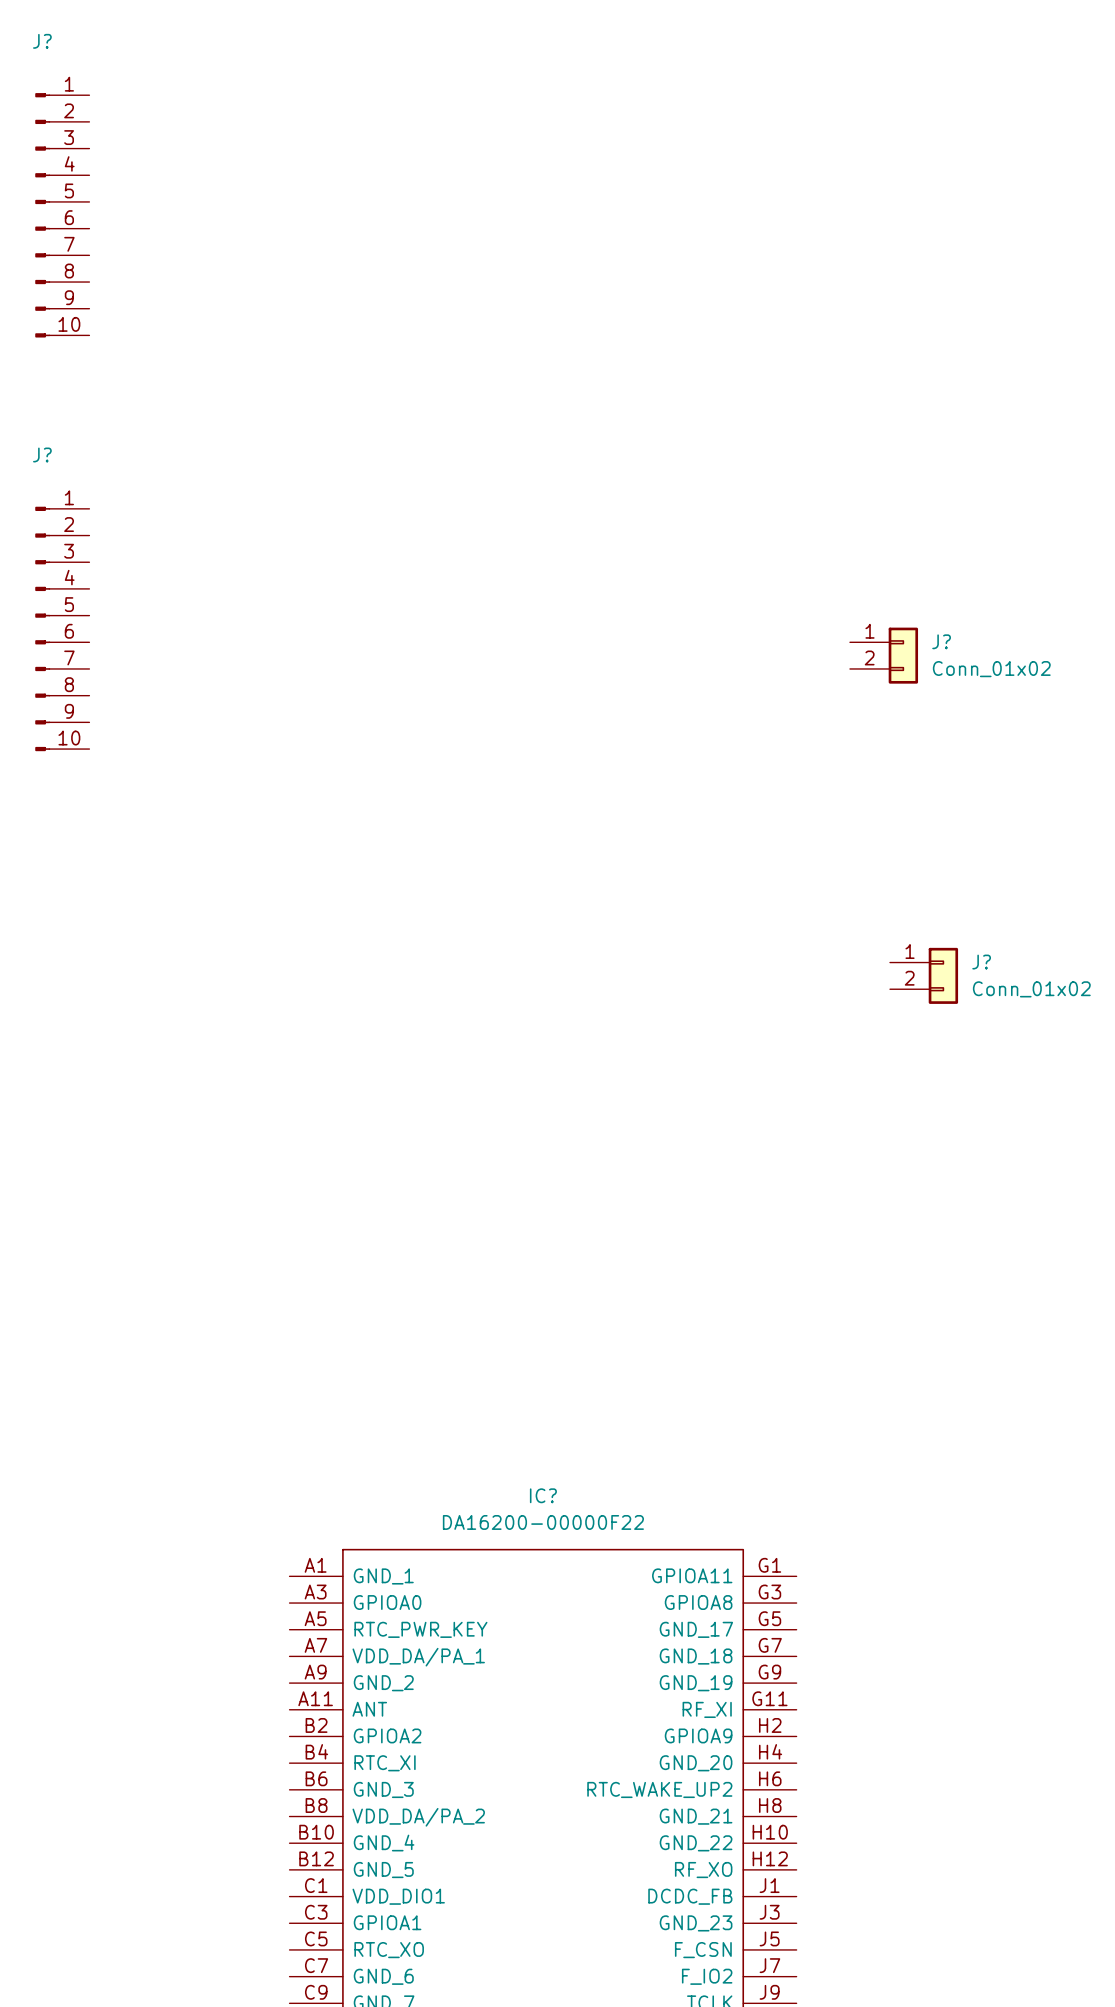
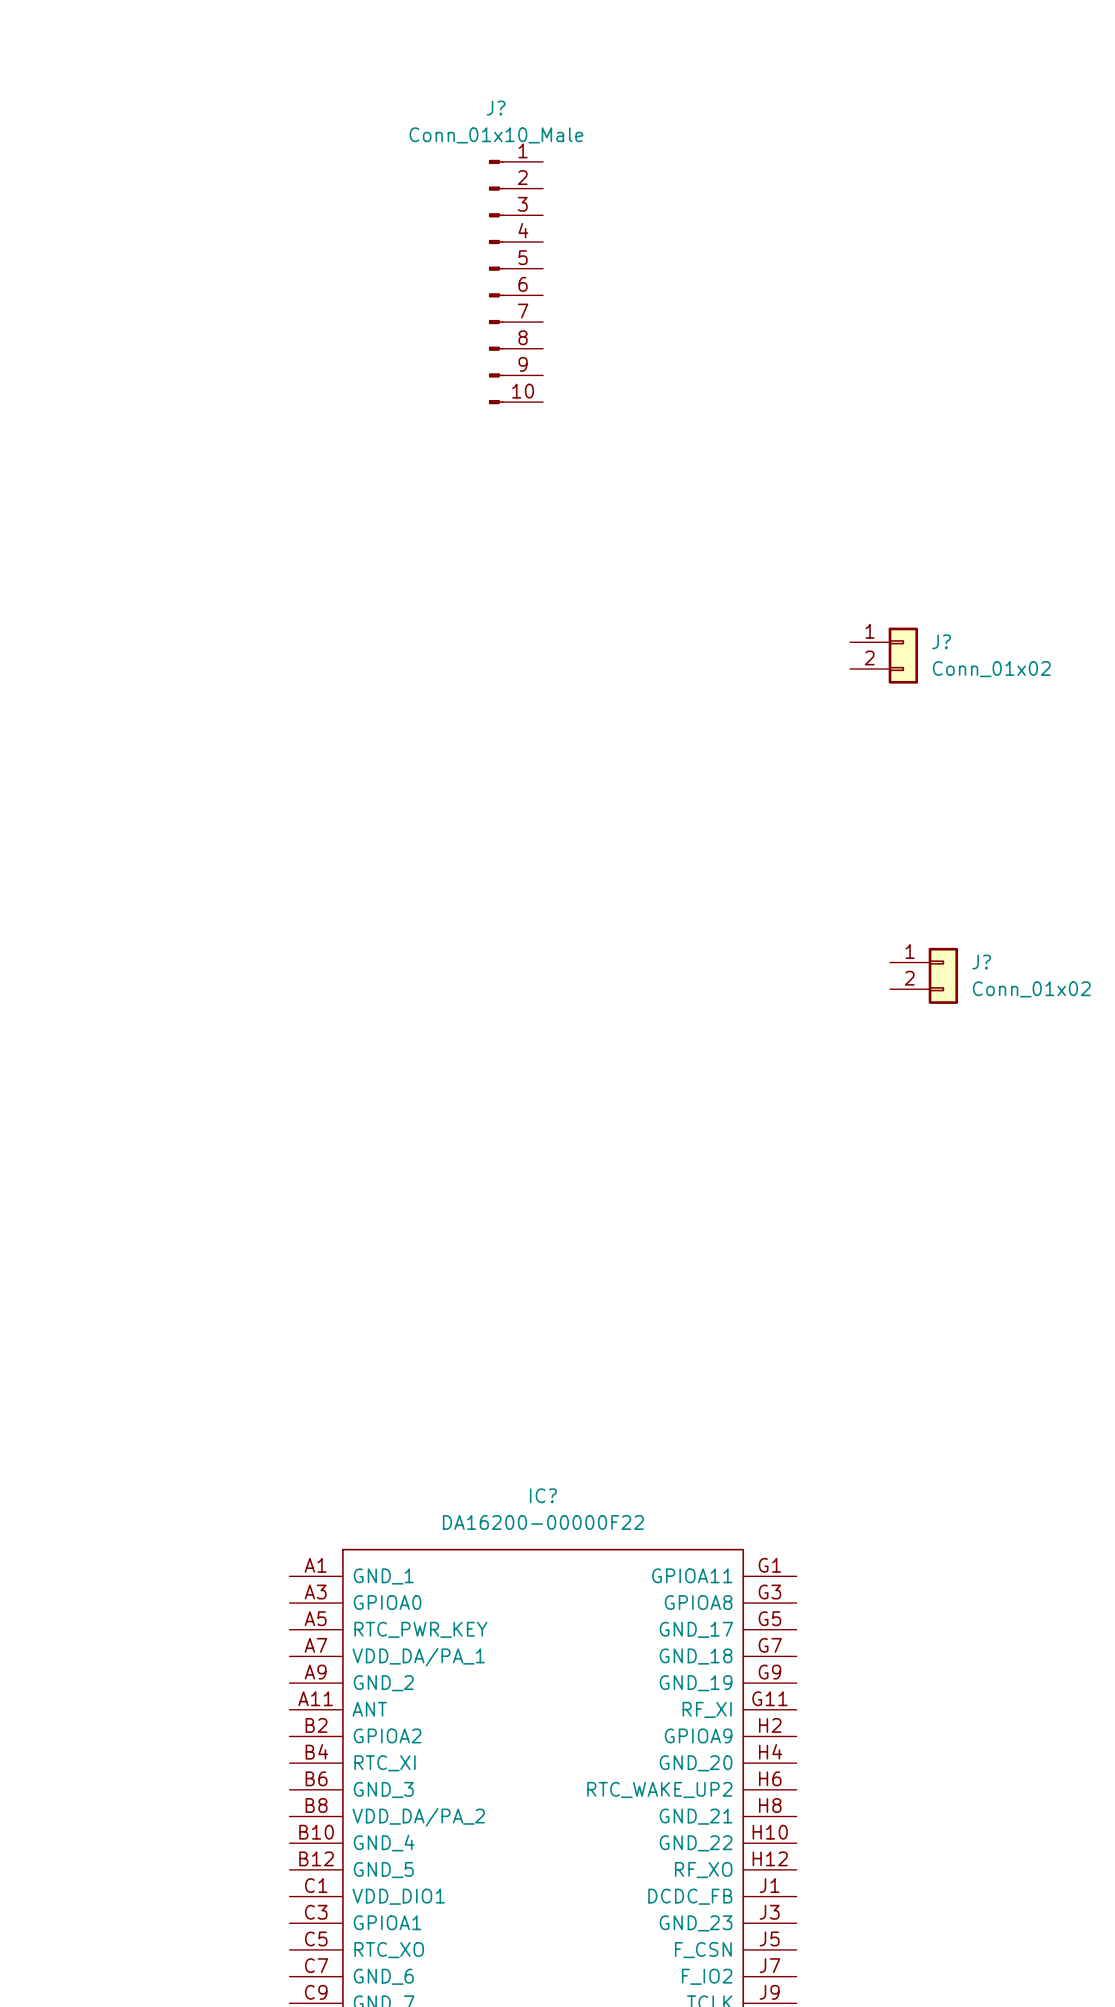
J?: (62, 215) -> none
J?: none -> Conn_01x10_Male (516, 282)
J?: (62, 628) -> none

